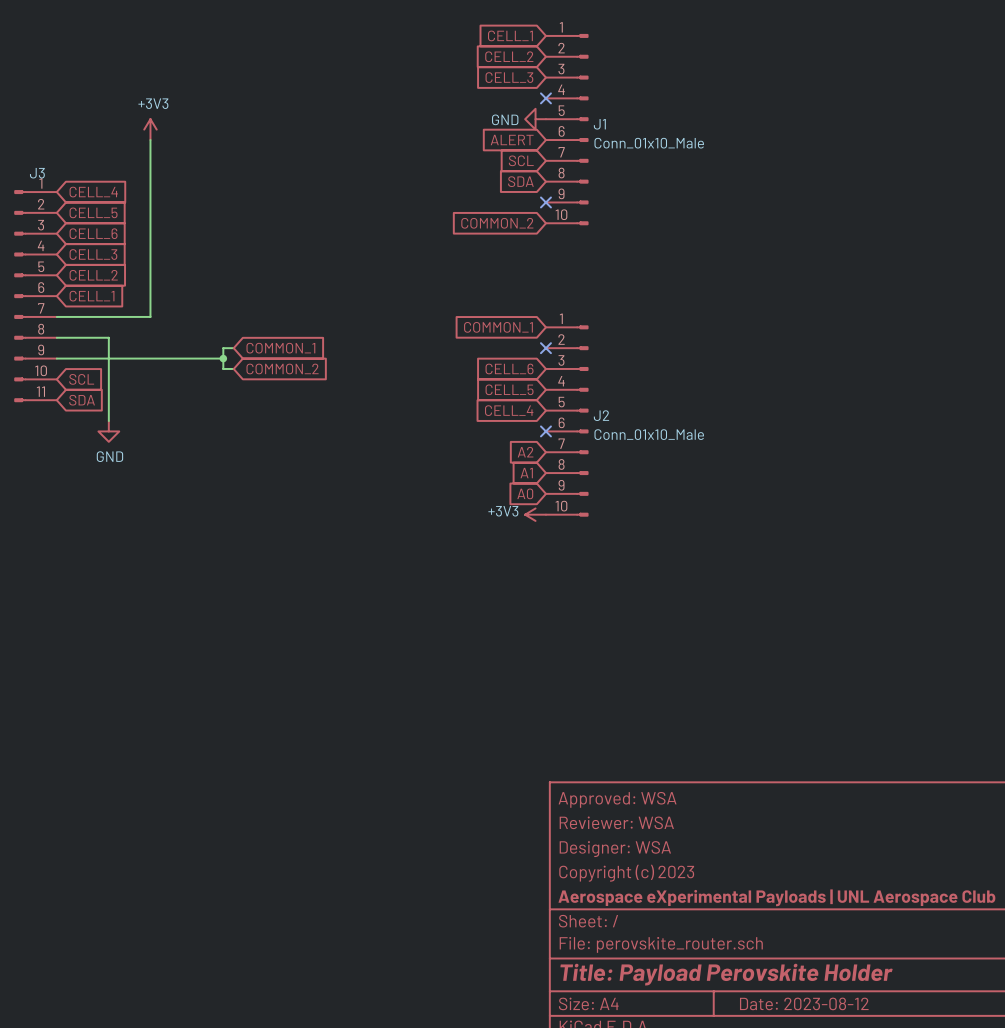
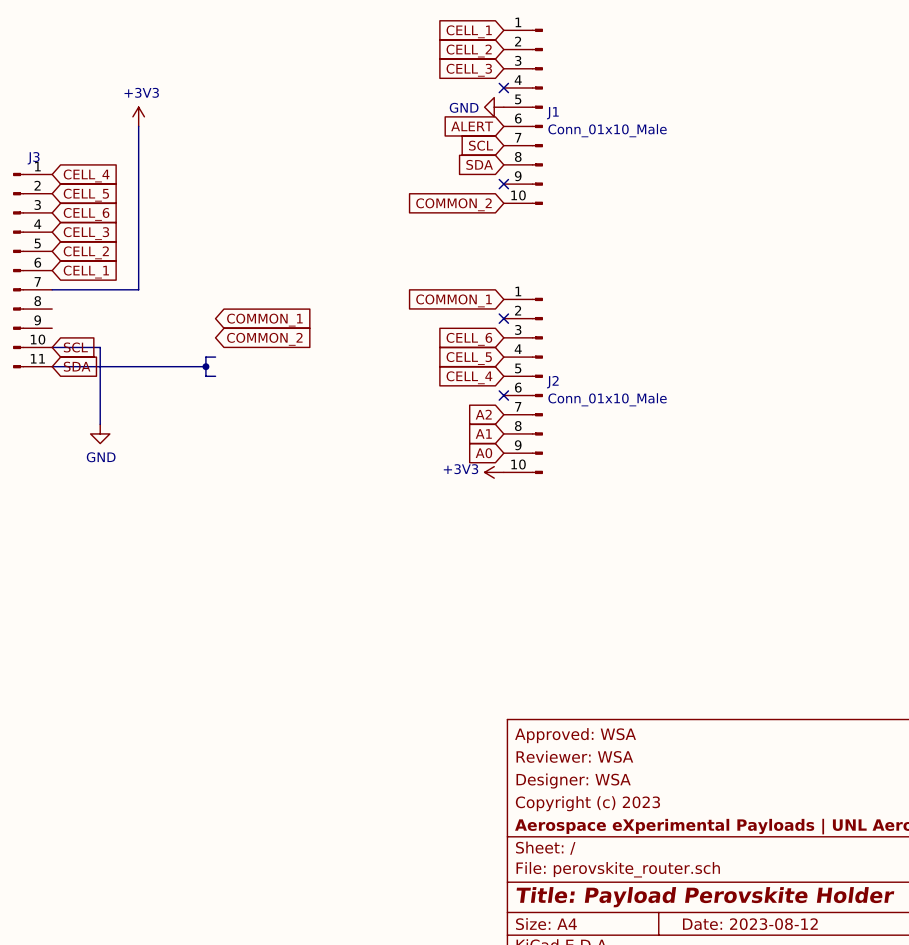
wire: (56, 337) (108, 337) (108, 379) -> (52, 347) (100, 347)
wire: (233, 348) (223, 348) (223, 368) (233, 368) -> (215, 357) (205, 357) (205, 376) (215, 376)
wire: (56, 358) (223, 358) -> (52, 366) (205, 366)
junction position: (223, 358) -> (205, 366)
wire: none -> (100, 385) (100, 424)
power symbol position: GND (108, 431) -> GND (100, 433)

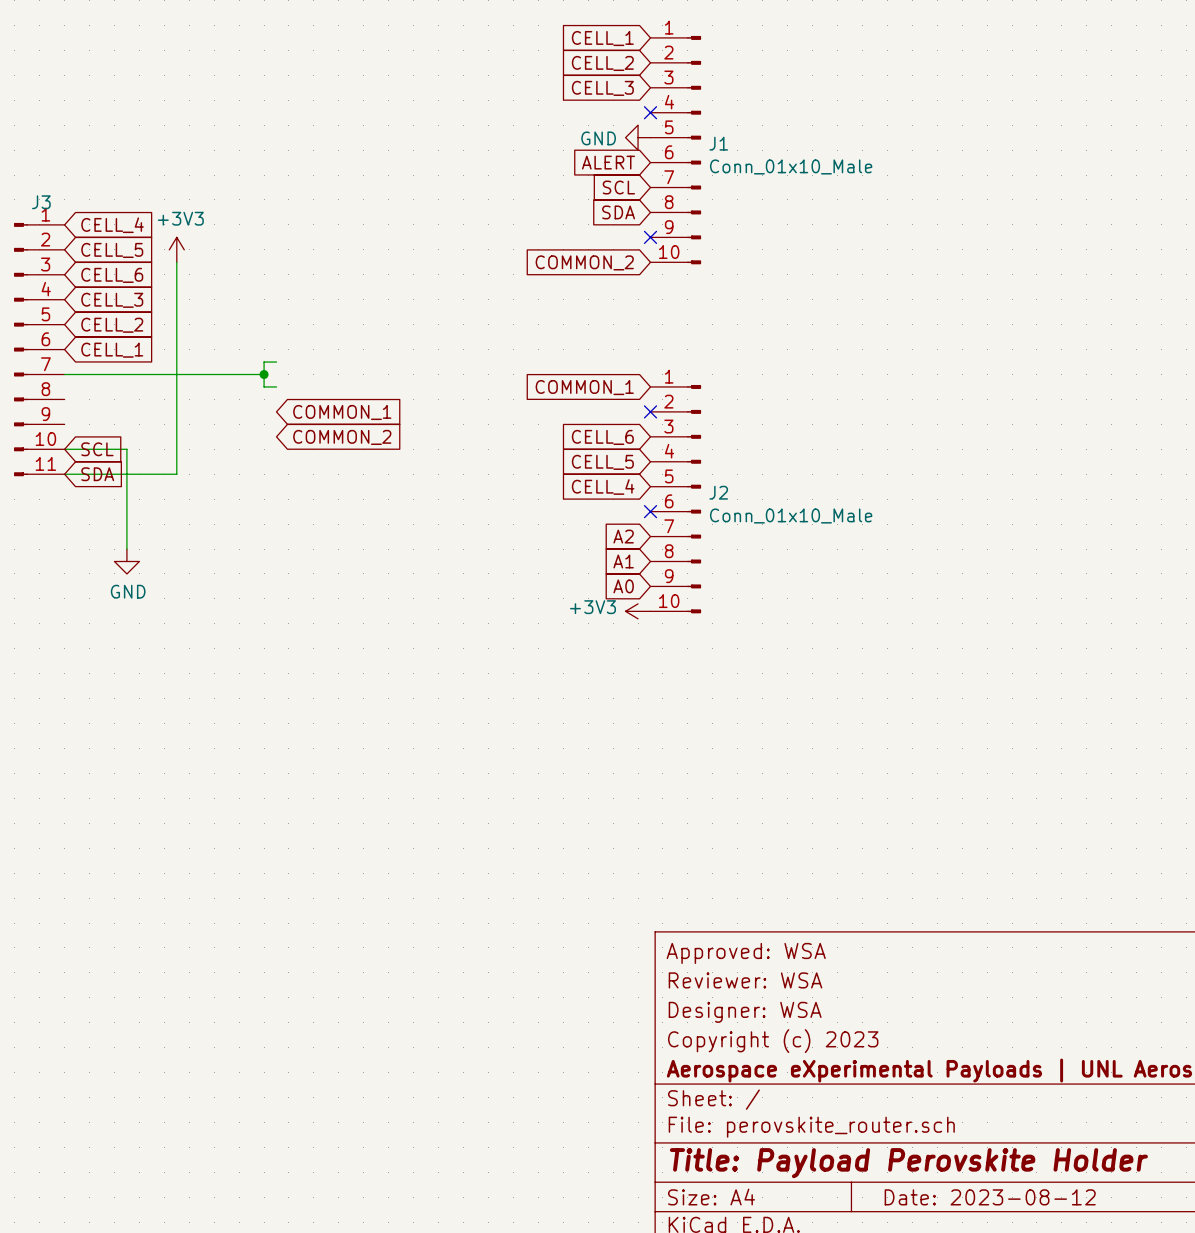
power symbol position: +3V3 (138, 116) -> +3V3 (176, 249)
wire: (138, 126) (138, 203) -> none
junction: none -> (264, 374)
wire: (215, 357) (205, 357) (205, 376) (215, 376) -> (276, 362) (264, 362) (264, 386) (276, 386)
wire: (138, 366) (205, 366) -> (176, 474) (176, 374) (264, 374)
junction: (205, 366) -> none

